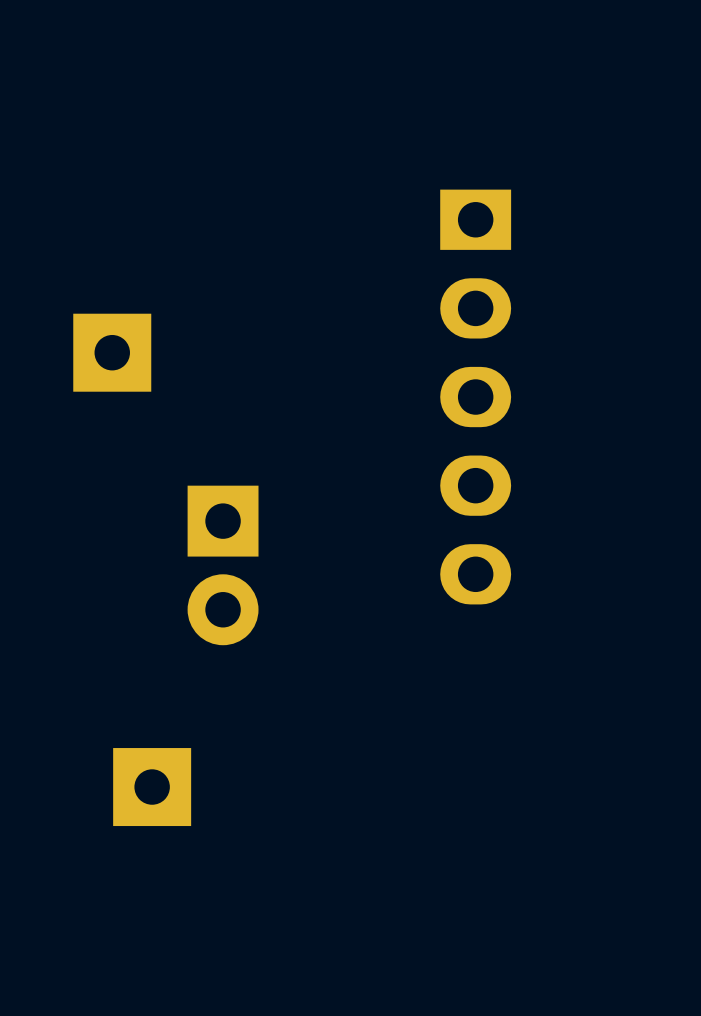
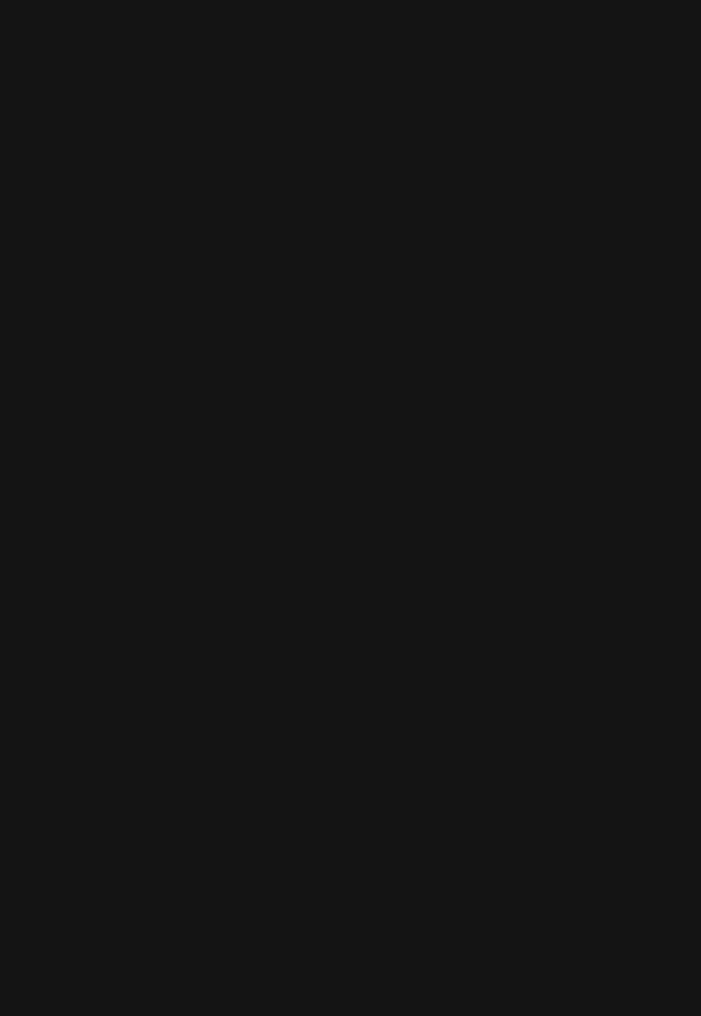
part: (112, 352) -> none
part: (475, 397) -> none
part: (223, 565) -> none
part: (152, 787) -> none

